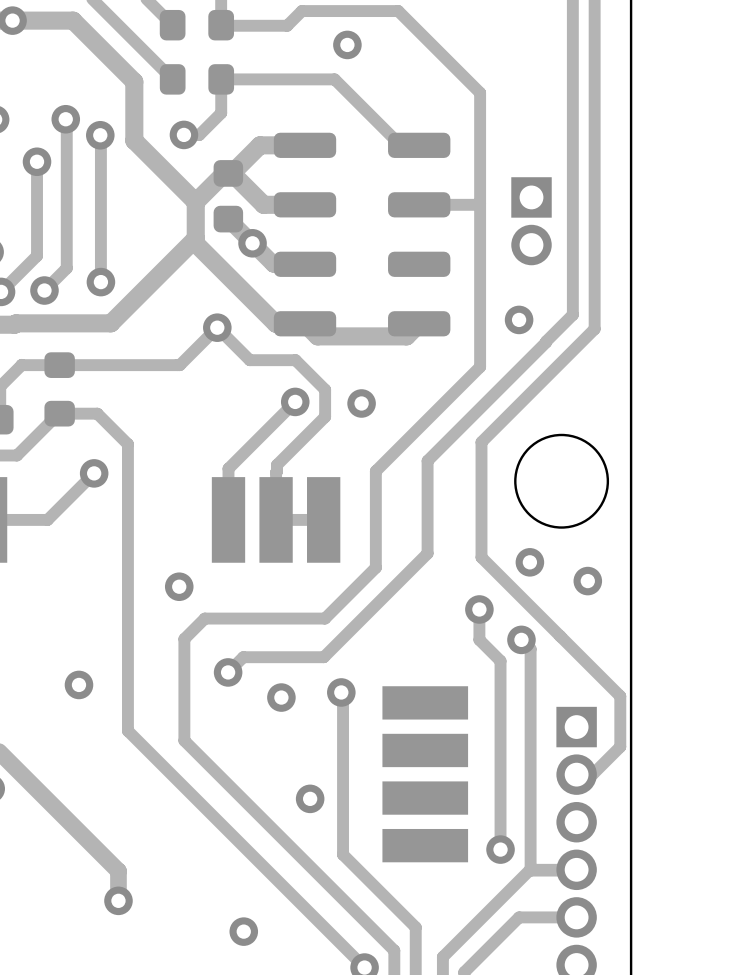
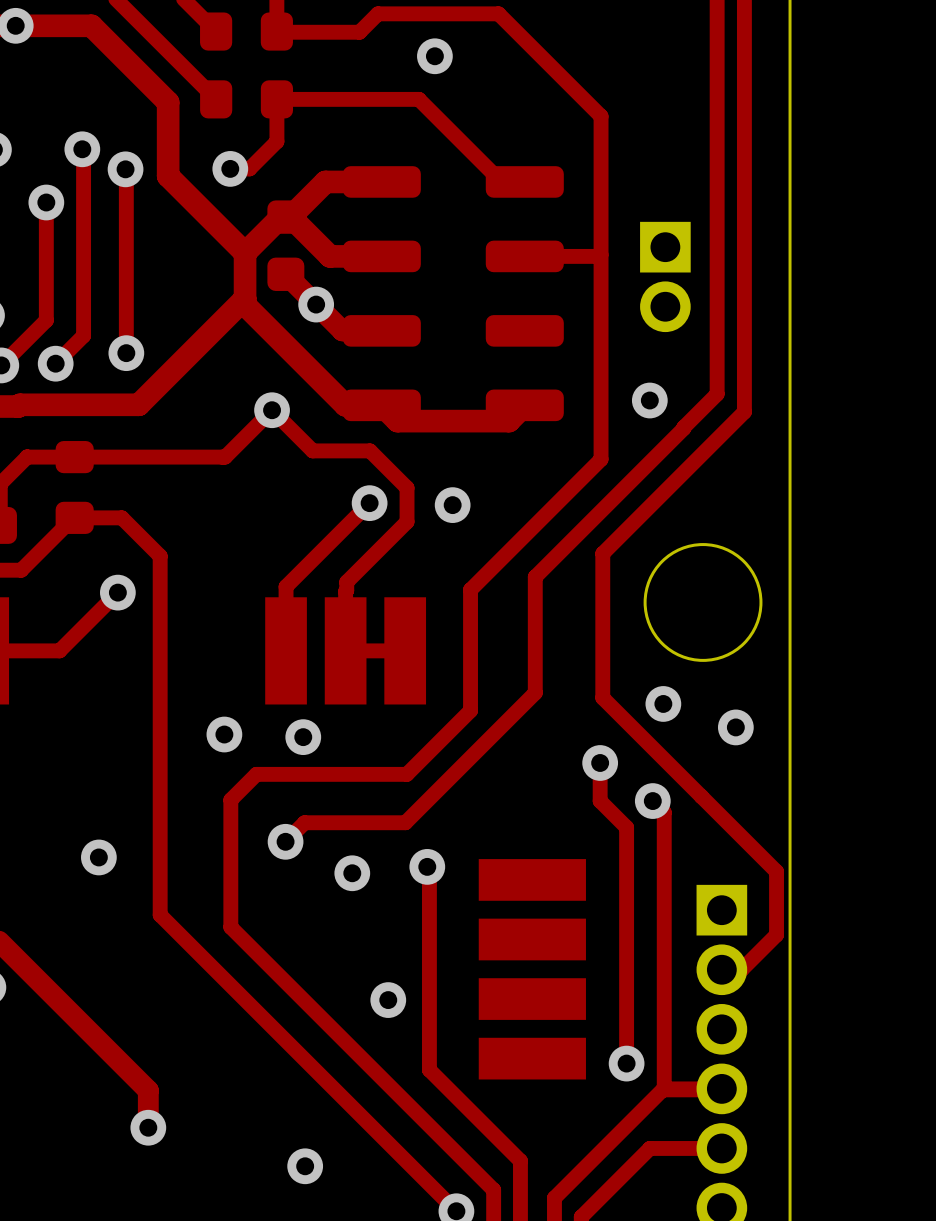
via: none -> (303, 737)

